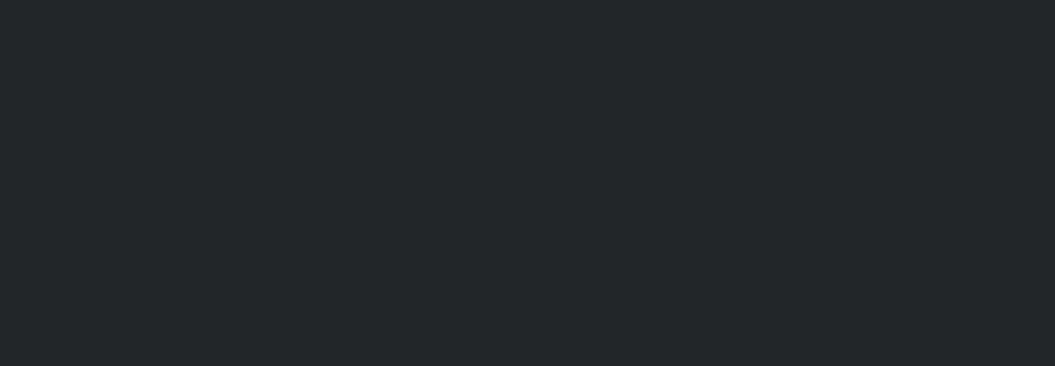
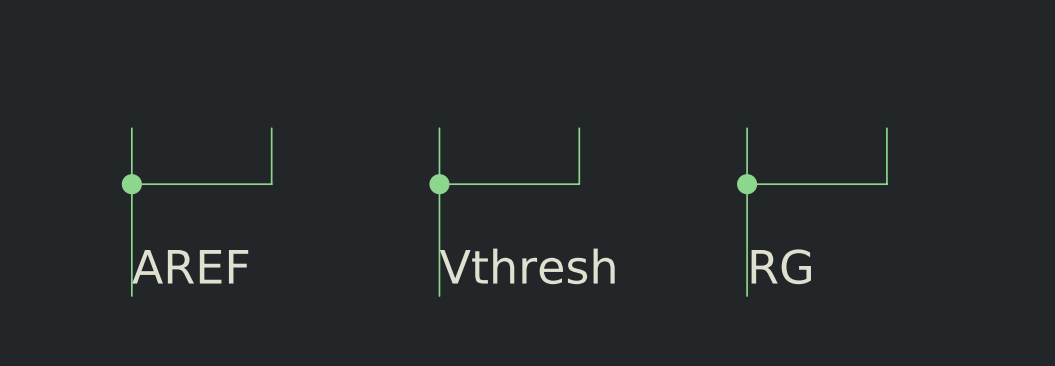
wire: none -> (131, 128) (131, 296)
wire: none -> (271, 128) (271, 184) (131, 184)
wire: none -> (439, 128) (439, 296)
wire: none -> (579, 128) (579, 184) (439, 184)
wire: none -> (747, 128) (747, 296)
wire: none -> (886, 128) (886, 184) (747, 184)
junction: none -> (131, 184)
junction: none -> (439, 184)
junction: none -> (747, 184)
label: none -> AREF (190, 266)
label: none -> Vthresh (527, 266)
label: none -> RG (781, 266)

